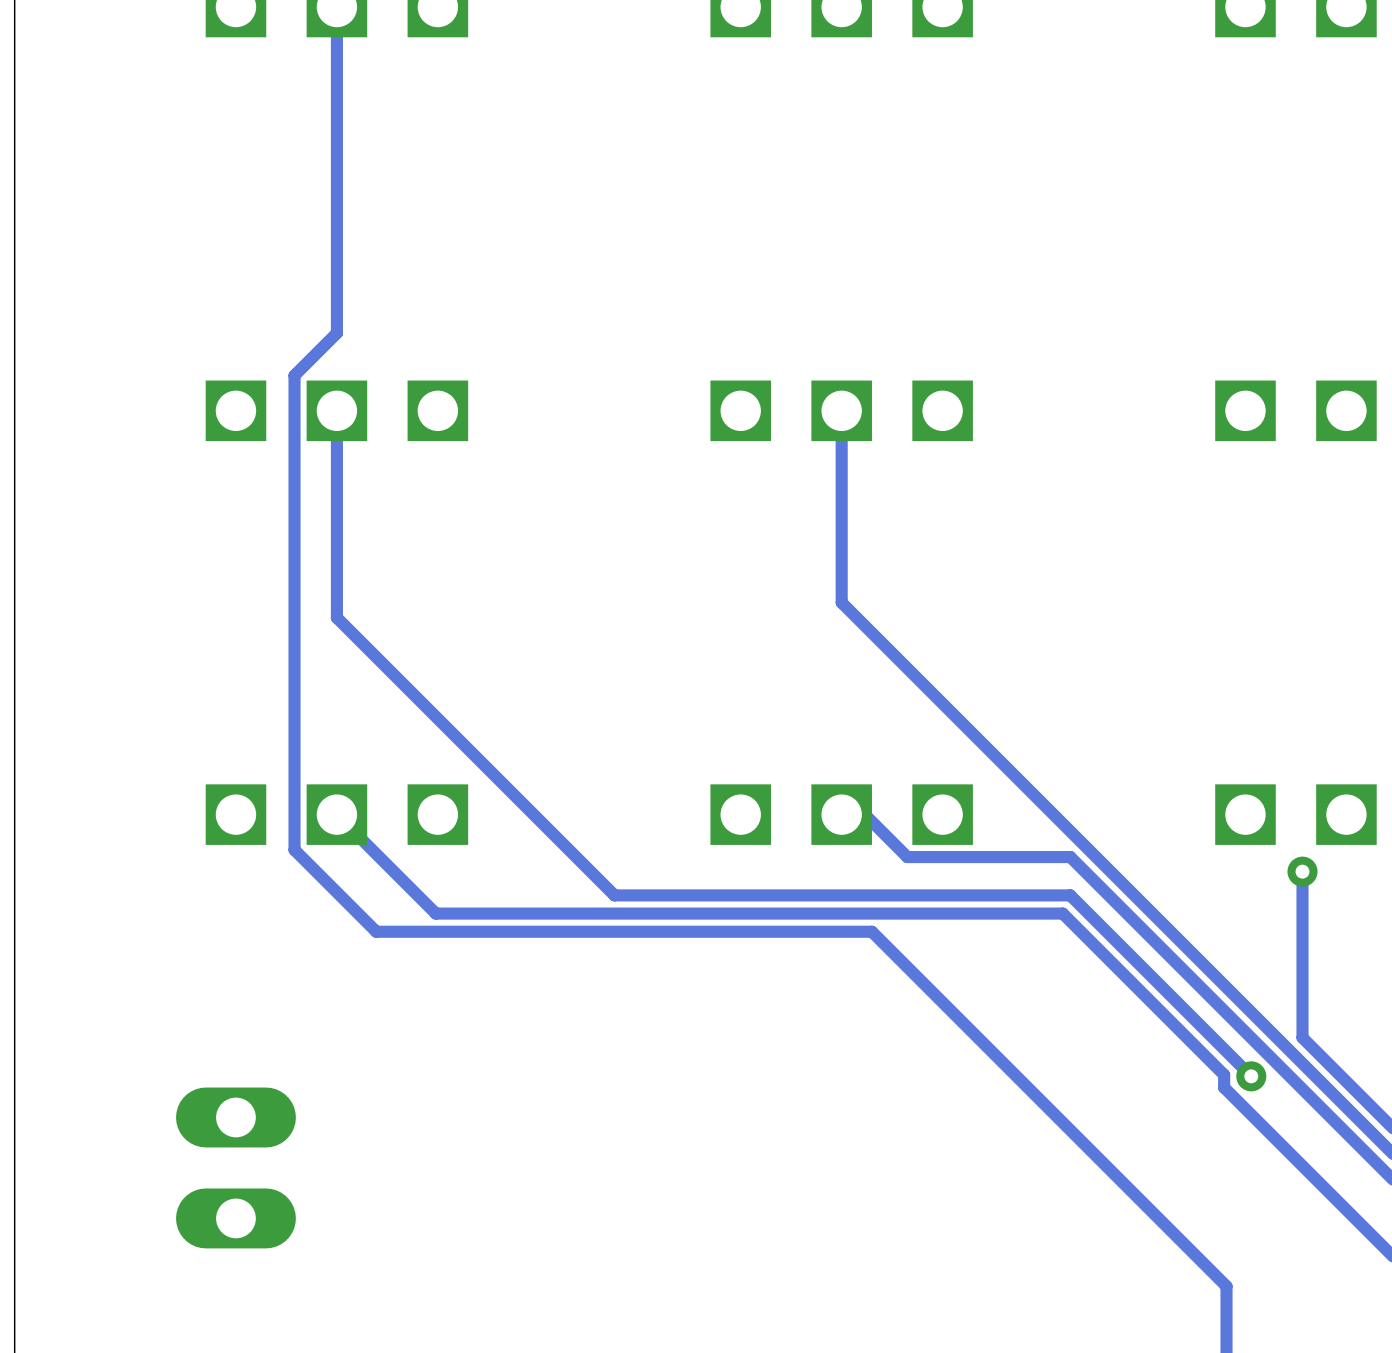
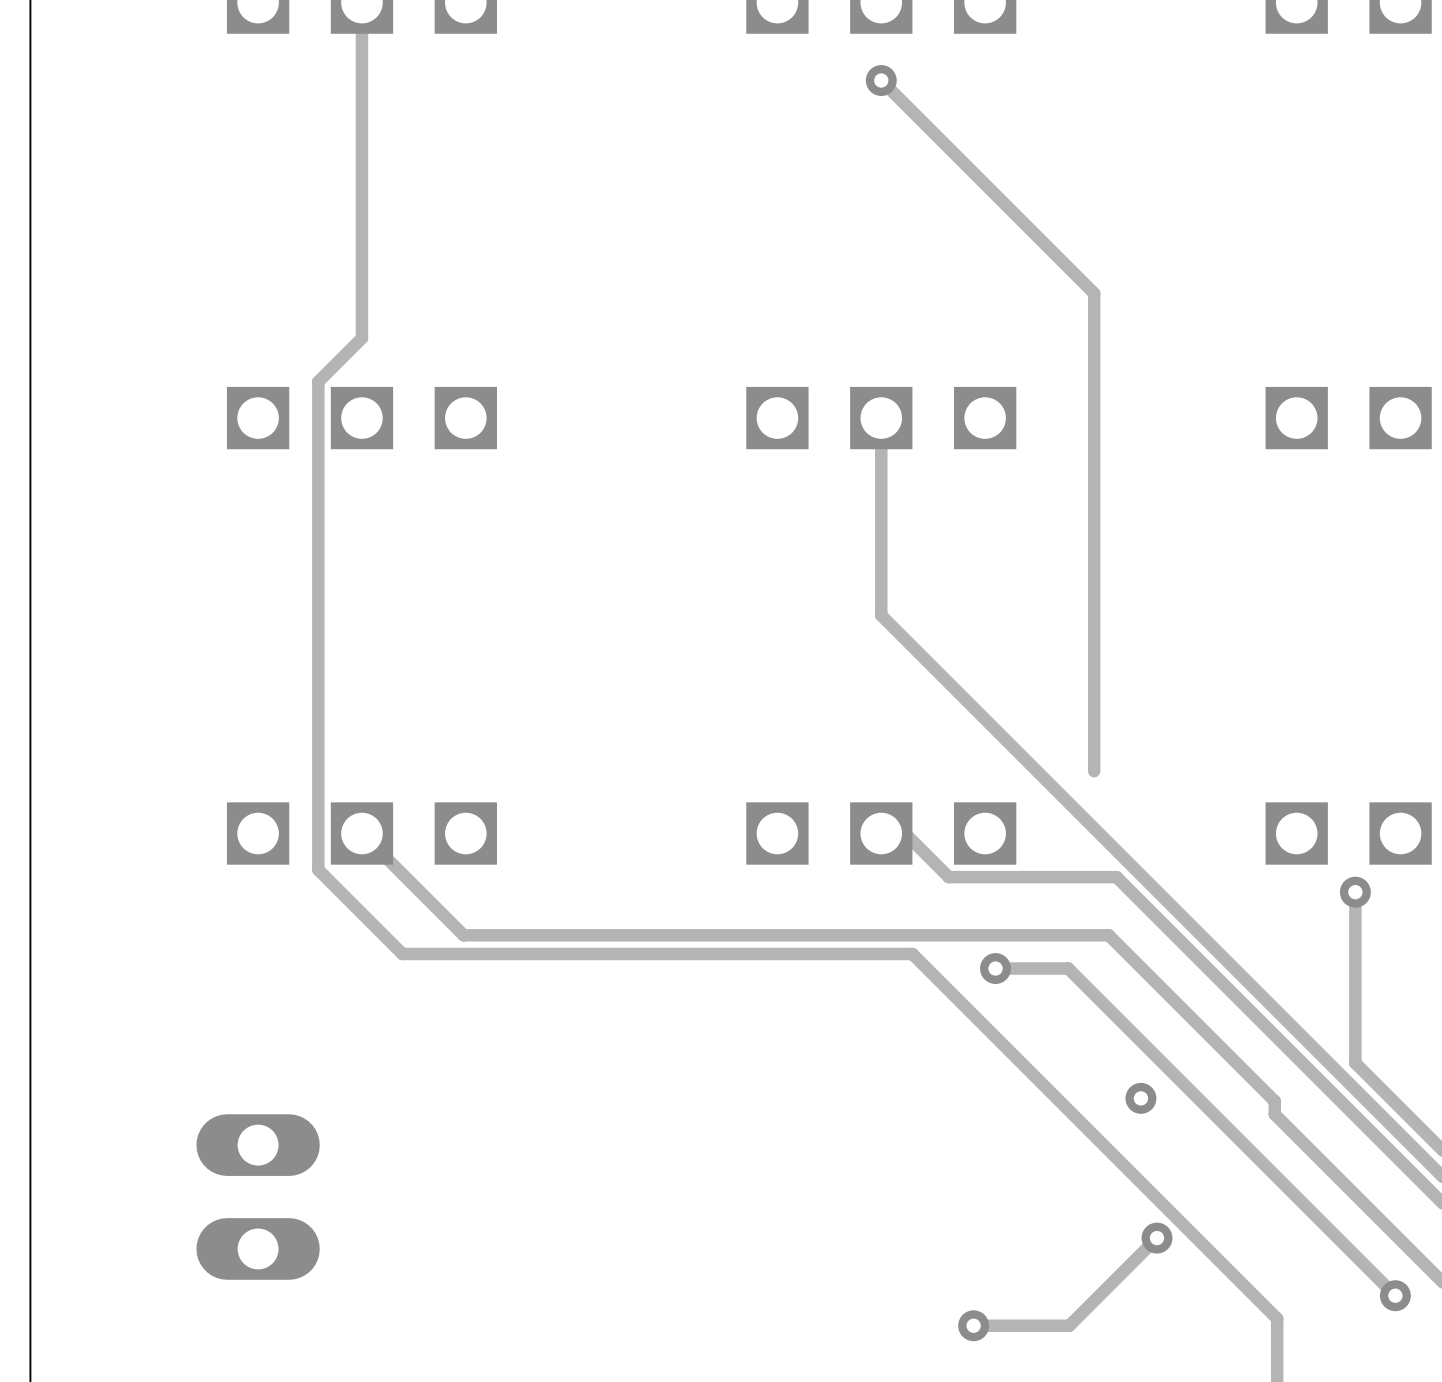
track: none -> (881, 80) (1094, 293) (1094, 771)
via: none -> (881, 80)
track: (336, 410) (336, 617) (614, 895) (1070, 895) (1251, 1076) -> none
track: none -> (995, 968) (1068, 968) (1395, 1295)
via: none -> (995, 968)
via: none -> (1140, 1098)
via: (1251, 1076) -> none
track: none -> (1161, 1233) (1069, 1325) (973, 1325)
via: none -> (1157, 1238)
via: none -> (1395, 1295)
via: none -> (973, 1325)

